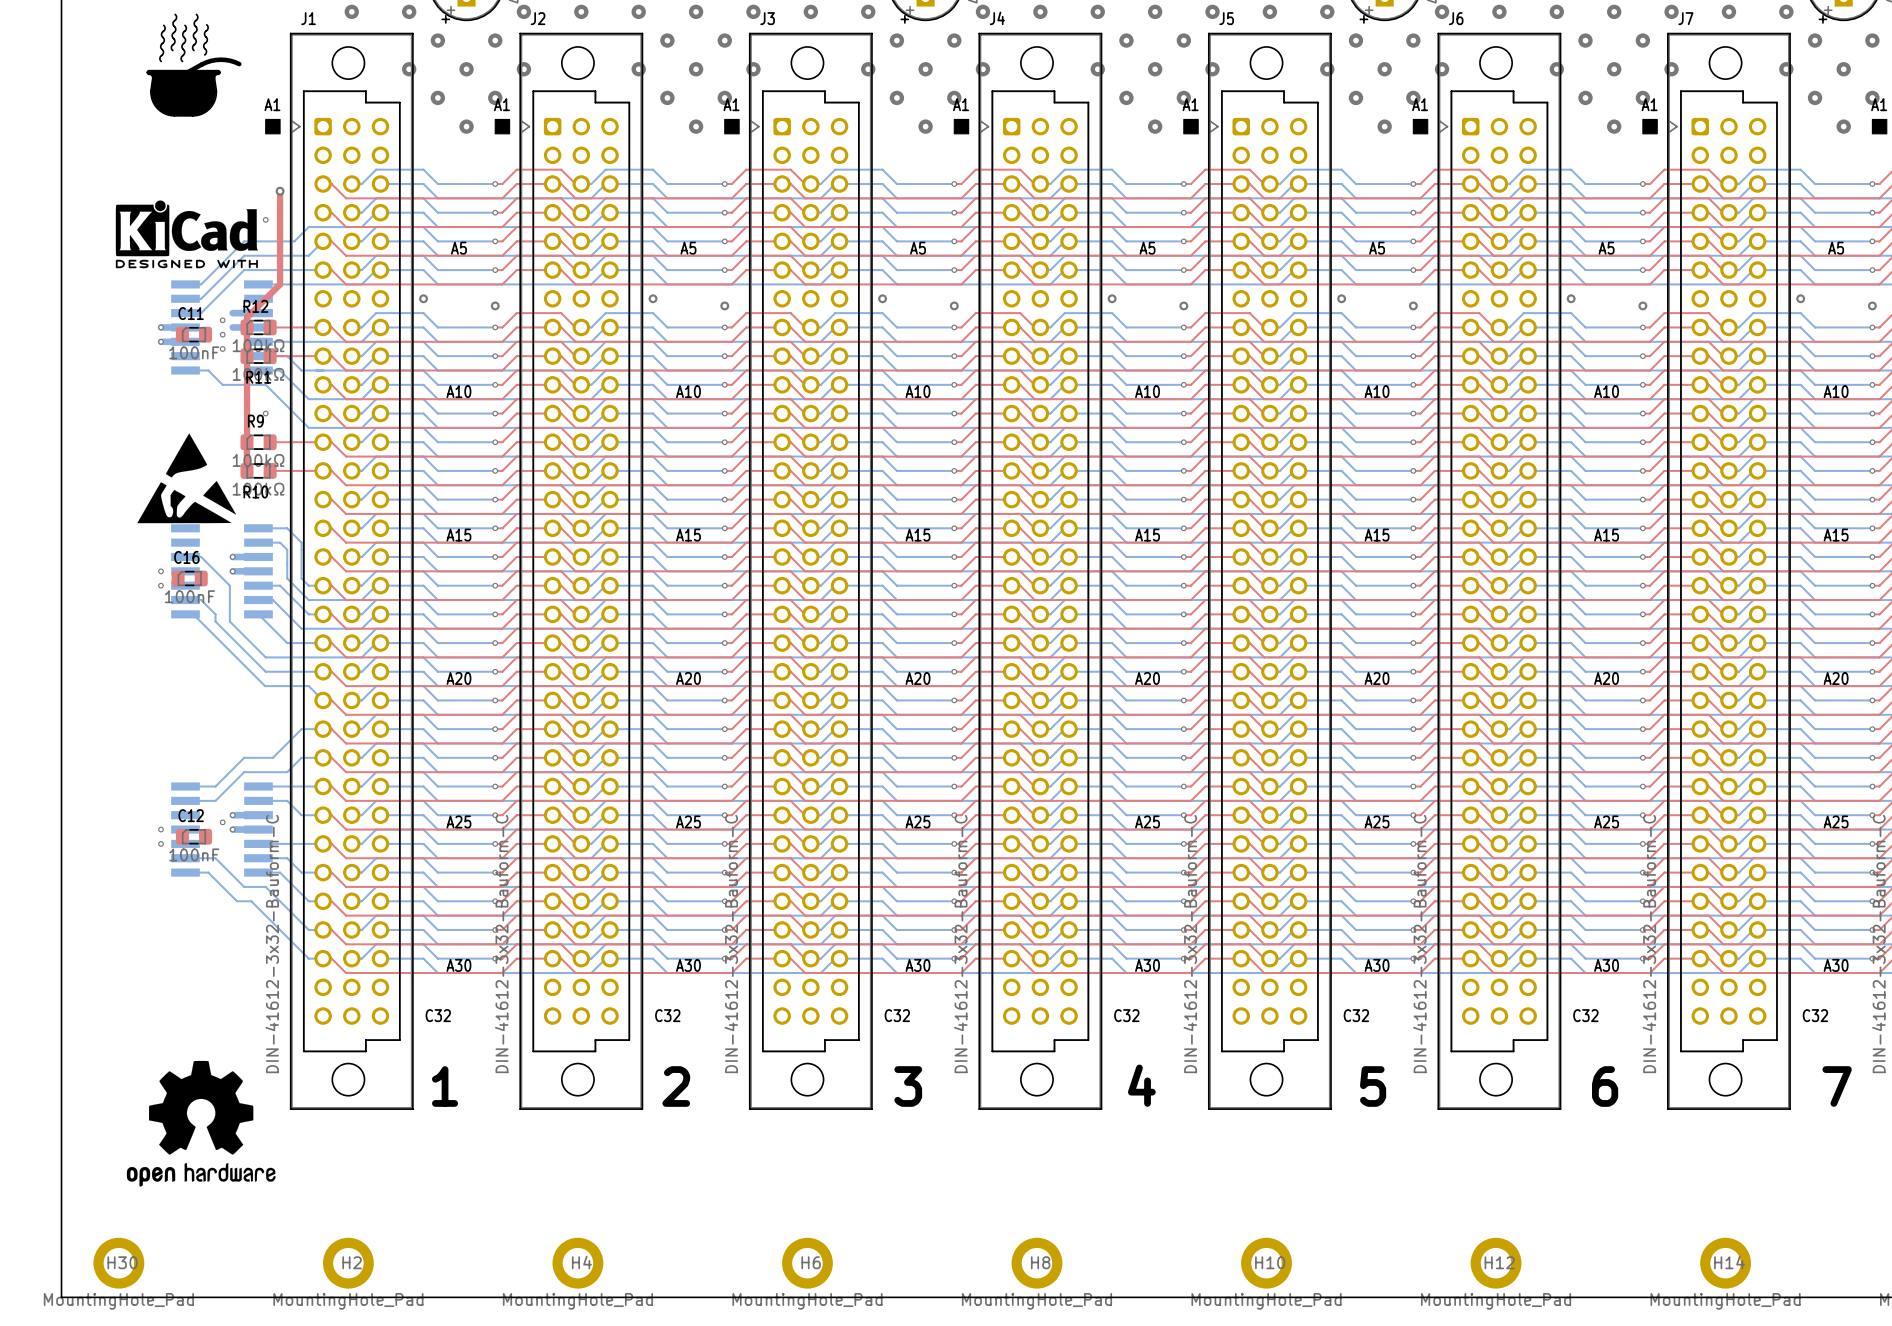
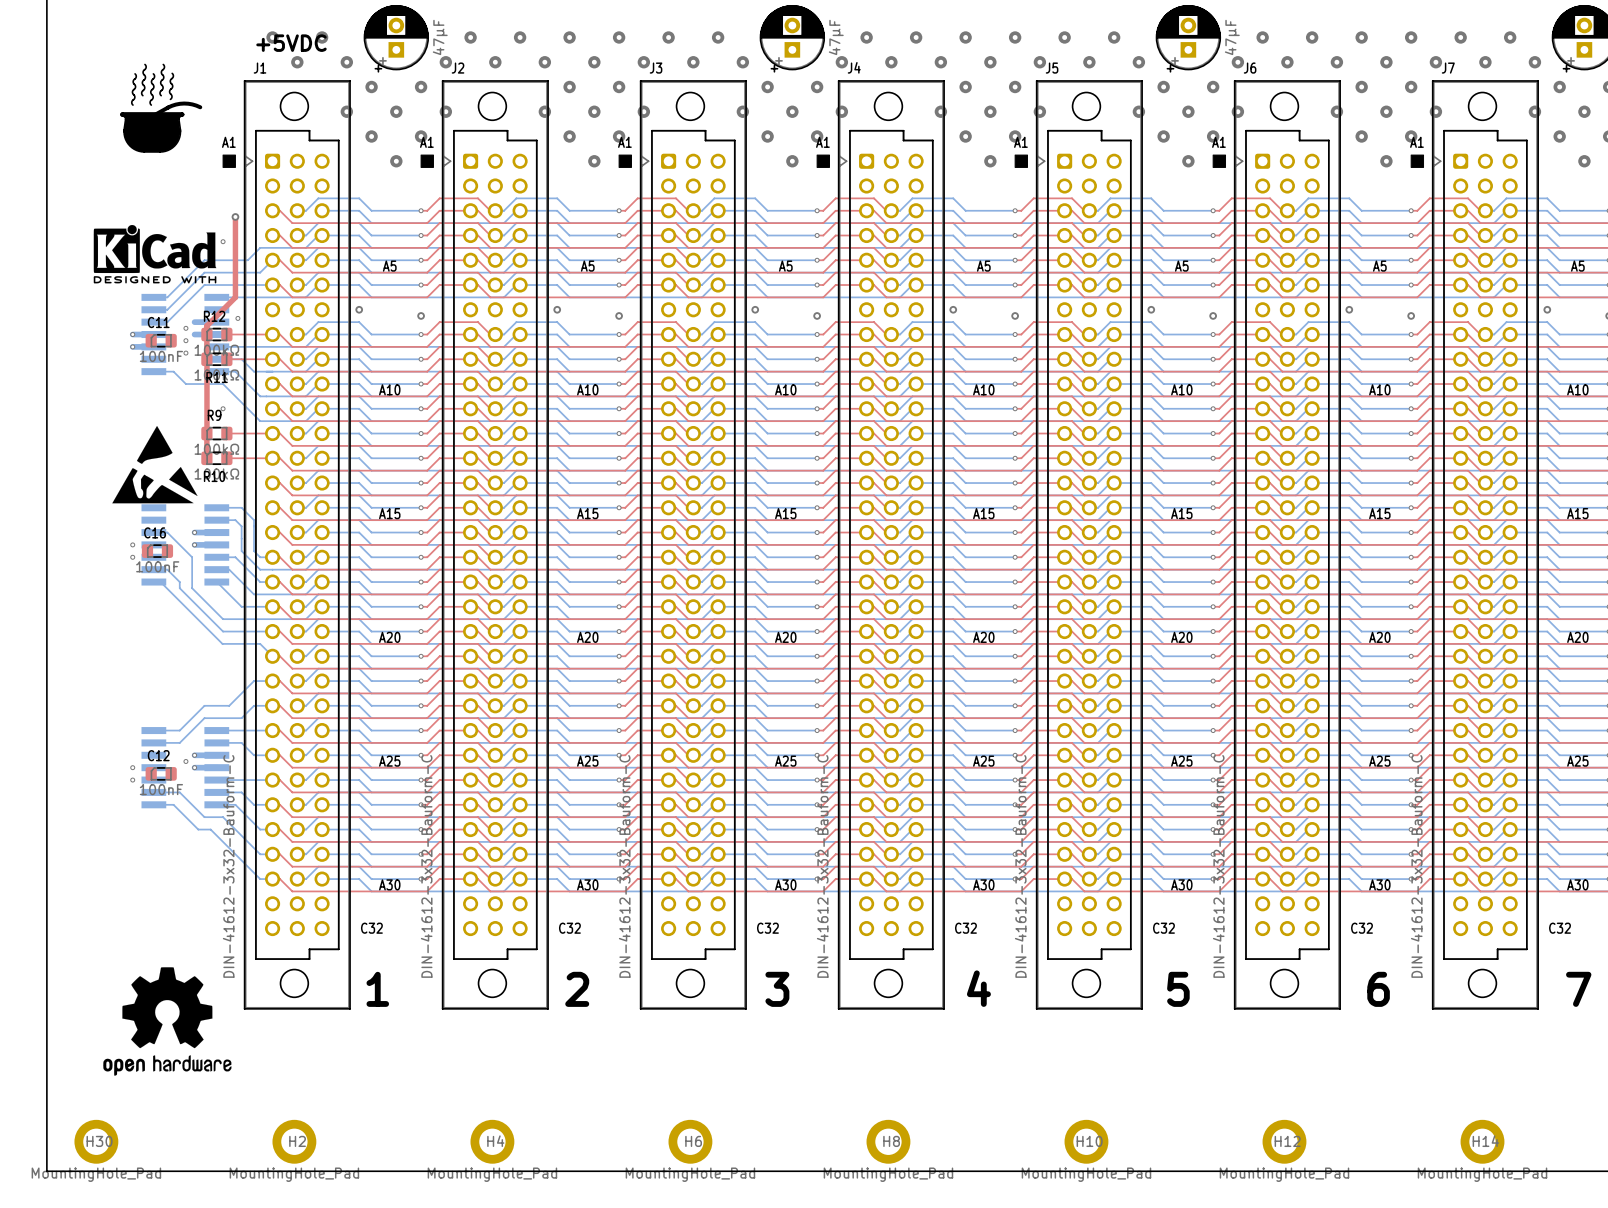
via: none -> (237, 318)

